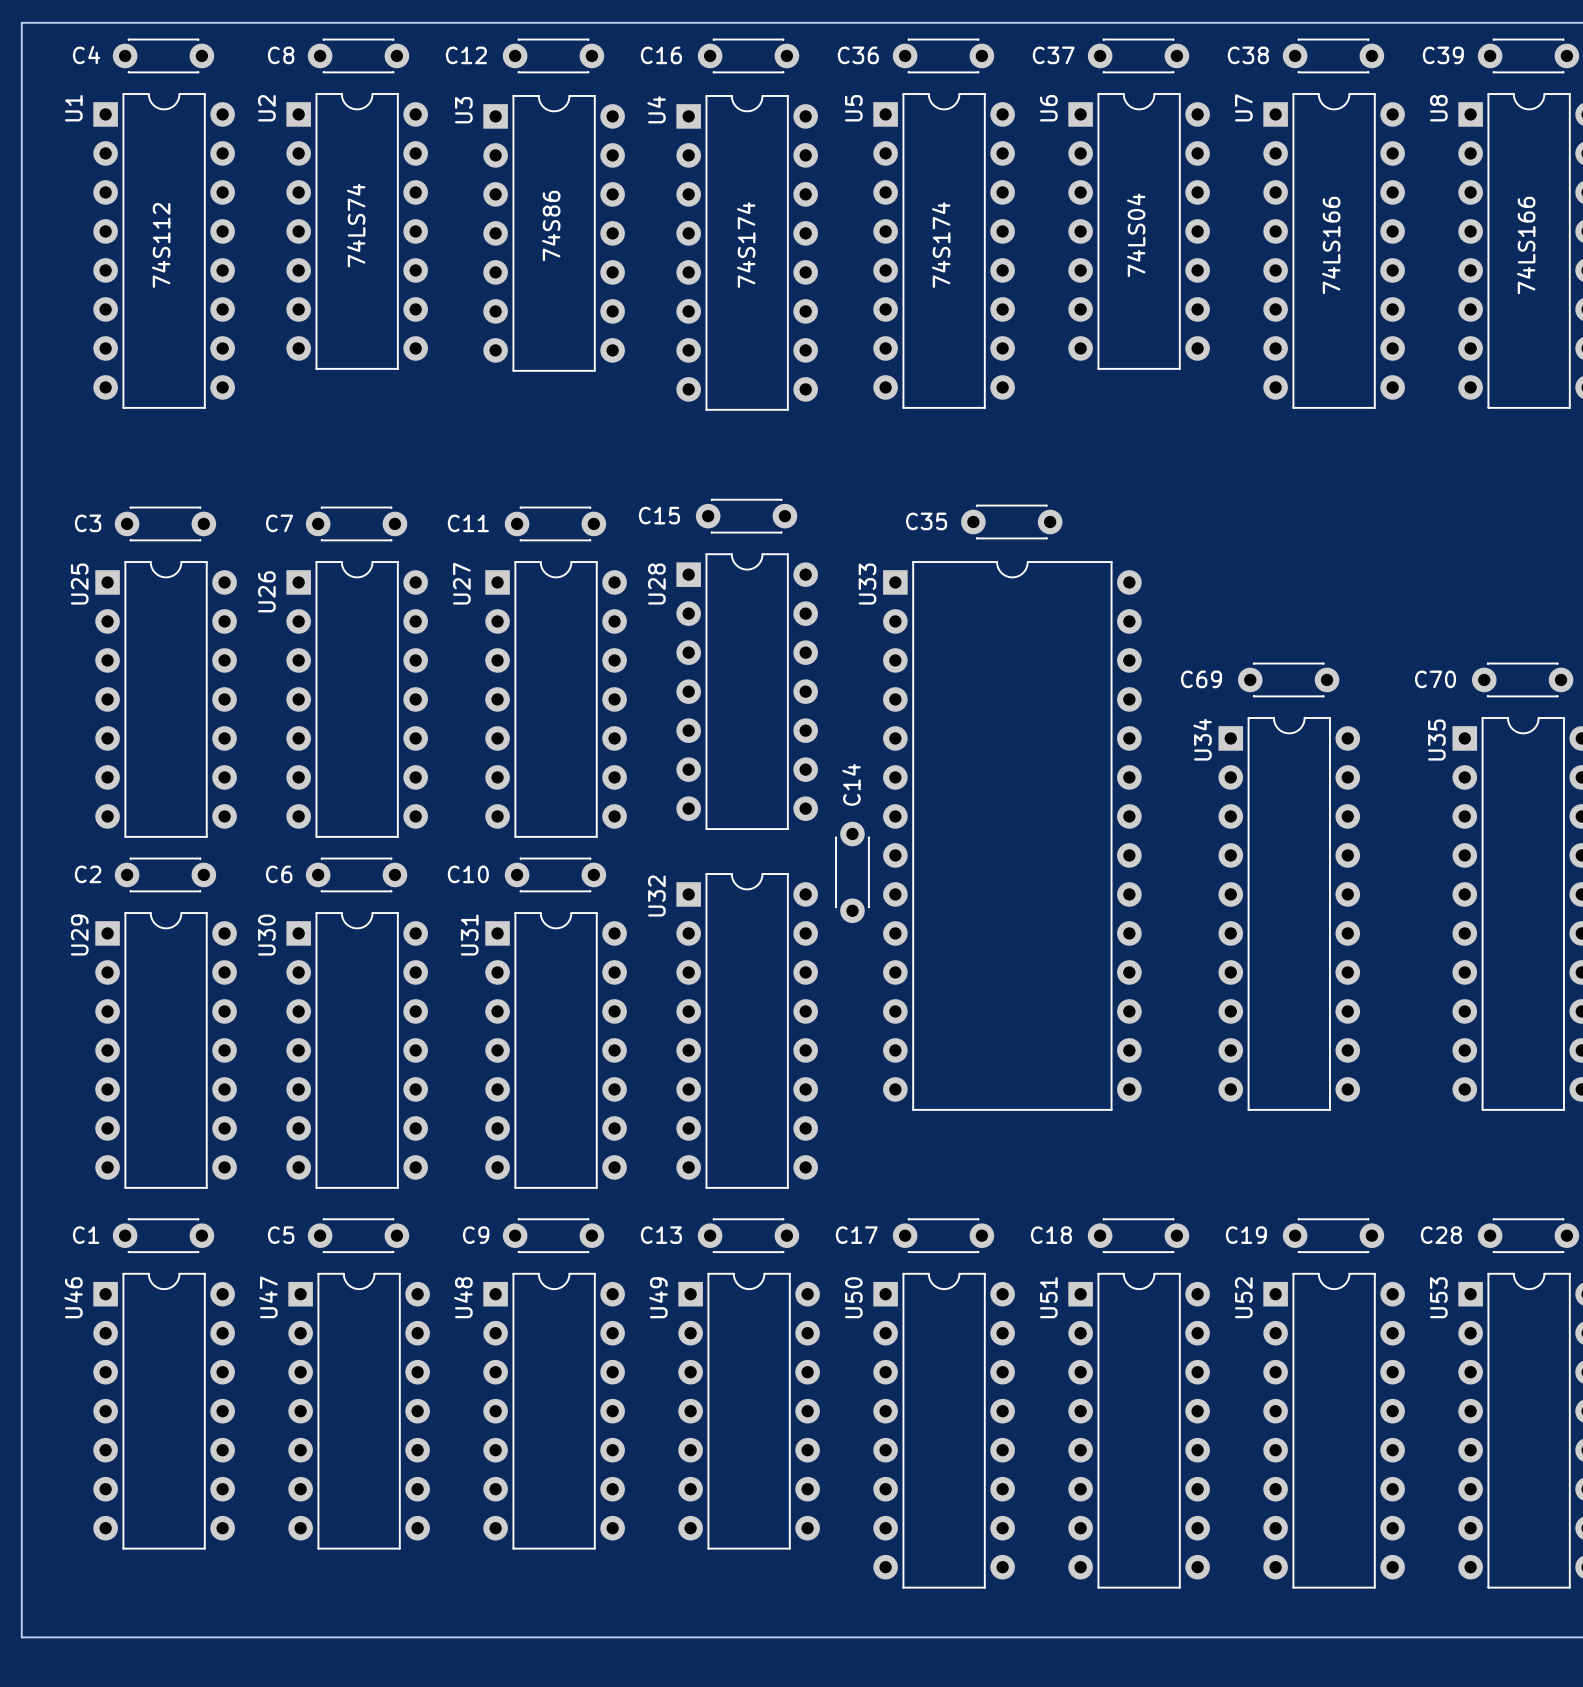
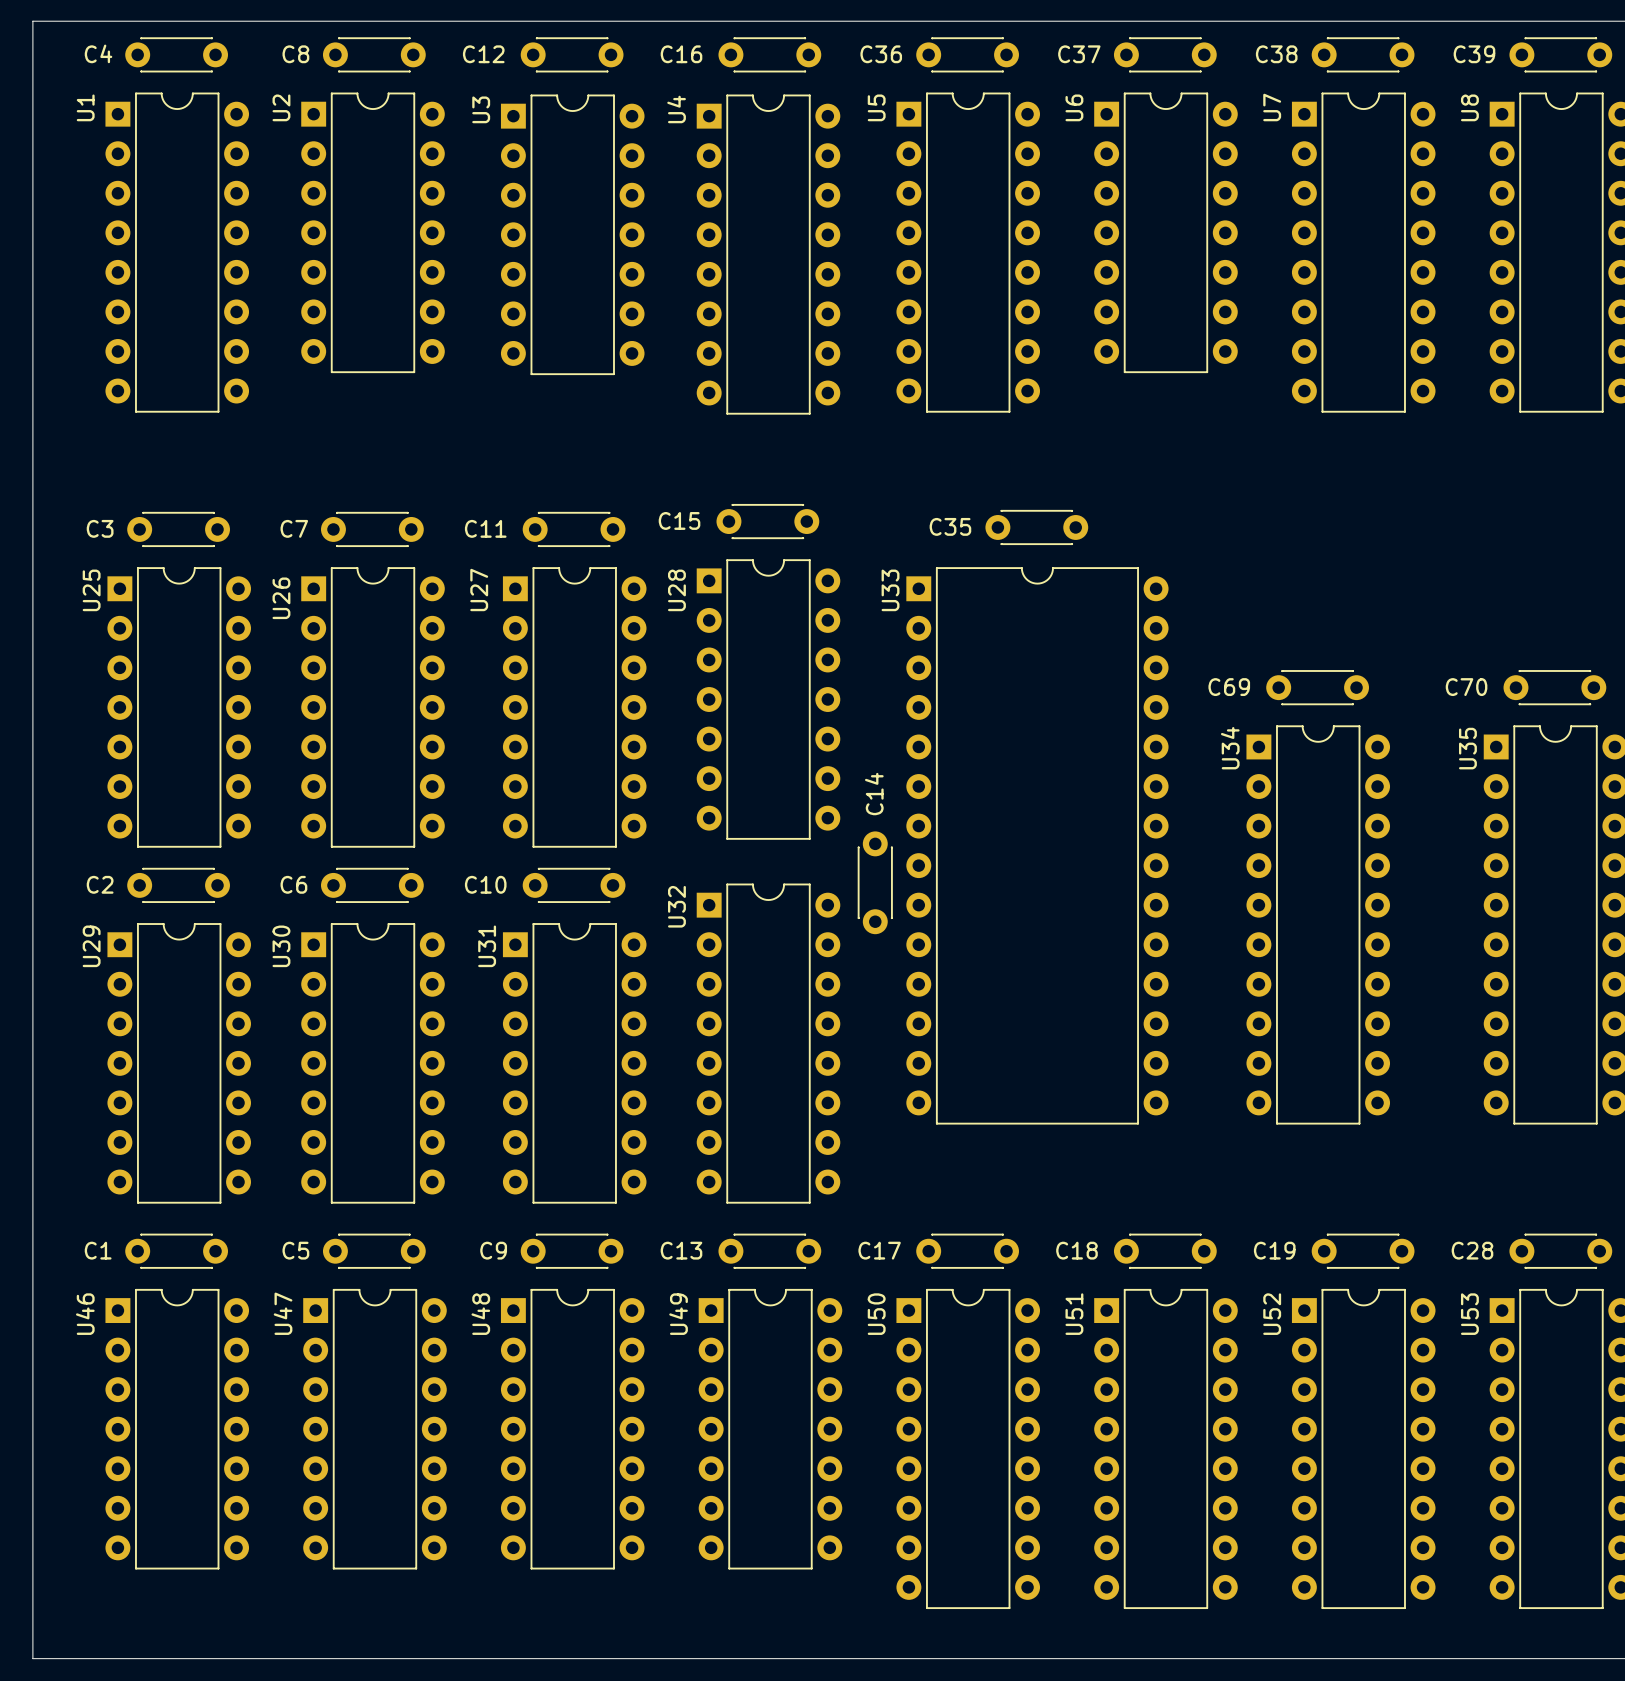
U2 value: 74LS74 (356, 225) -> none
U3 value: 74S86 (551, 225) -> none
U6 value: 74LS04 (1136, 235) -> none
U1 value: 74S112 (161, 245) -> none
U4 value: 74S174 (746, 245) -> none
U5 value: 74S174 (941, 245) -> none
U7 value: 74LS166 (1331, 245) -> none
U8 value: 74LS166 (1526, 245) -> none

